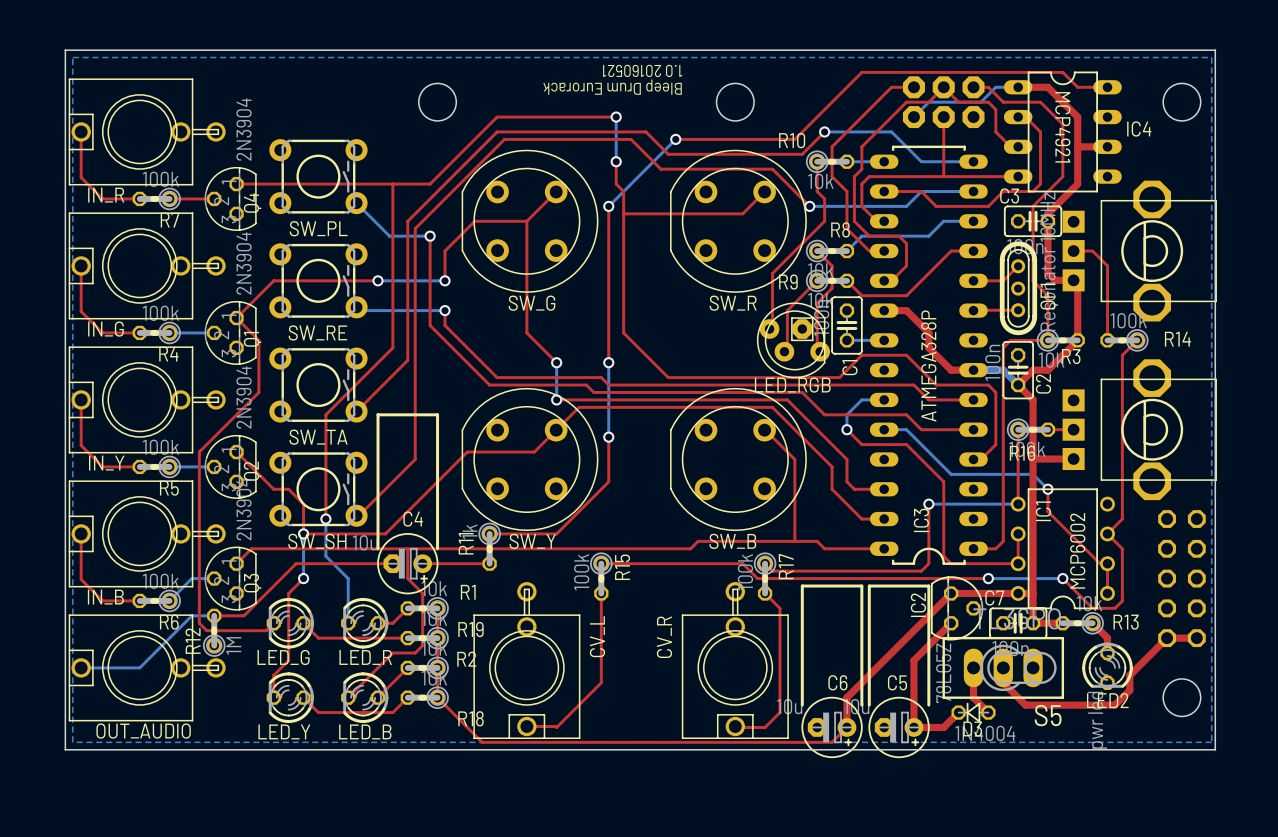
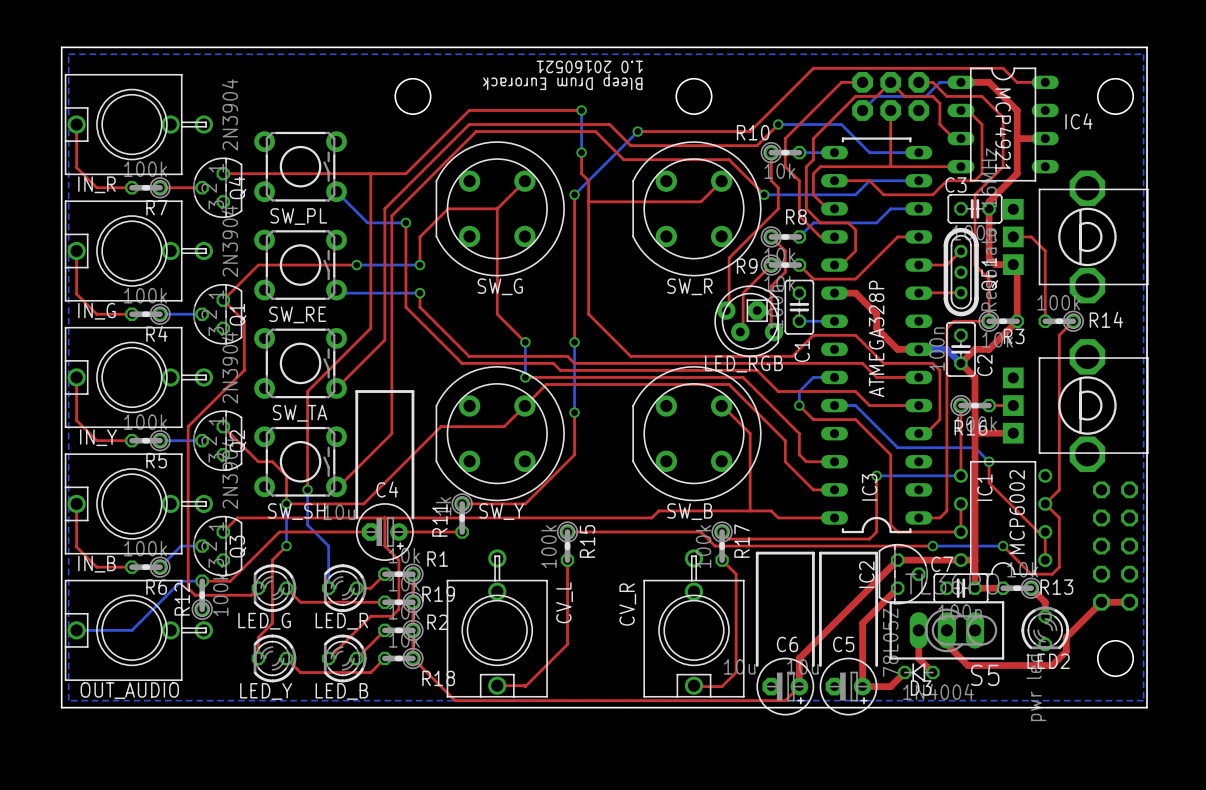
R12 value: 1M (233, 645) -> 100k (220, 594)

